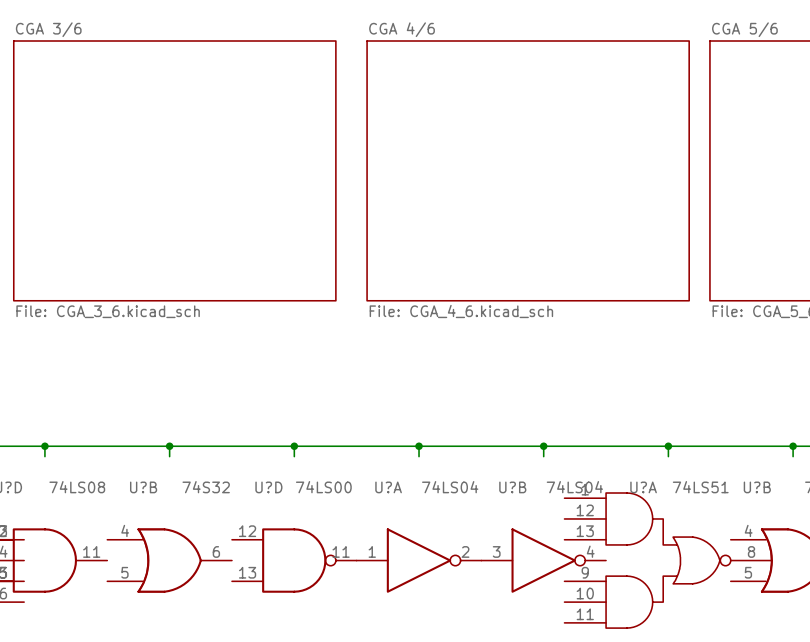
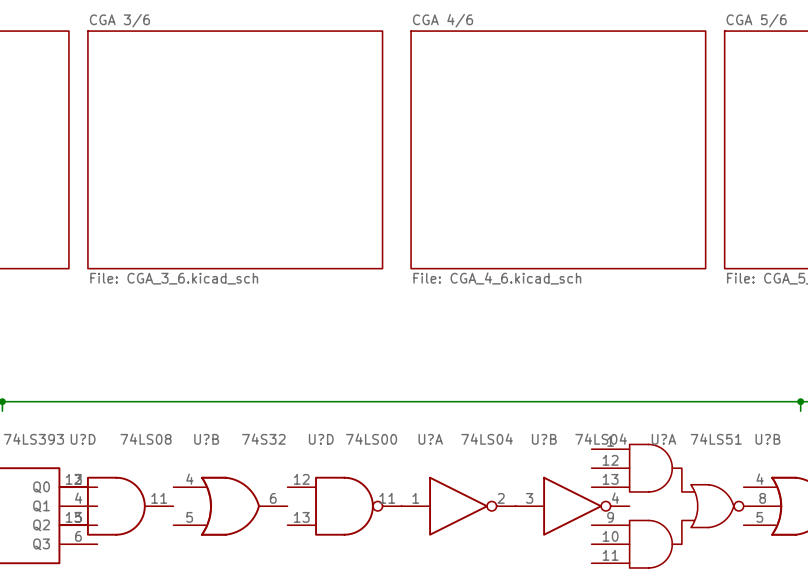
wire: (44, 446) (44, 456) -> none
junction: (44, 446) -> none
wire: (169, 446) (169, 456) -> none
junction: (169, 446) -> none
wire: (294, 446) (294, 456) -> none
junction: (294, 446) -> none
wire: (419, 446) (419, 456) -> none
junction: (419, 446) -> none
wire: (543, 446) (543, 456) -> none
junction: (543, 446) -> none
wire: (668, 446) (668, 456) -> none
junction: (668, 446) -> none

